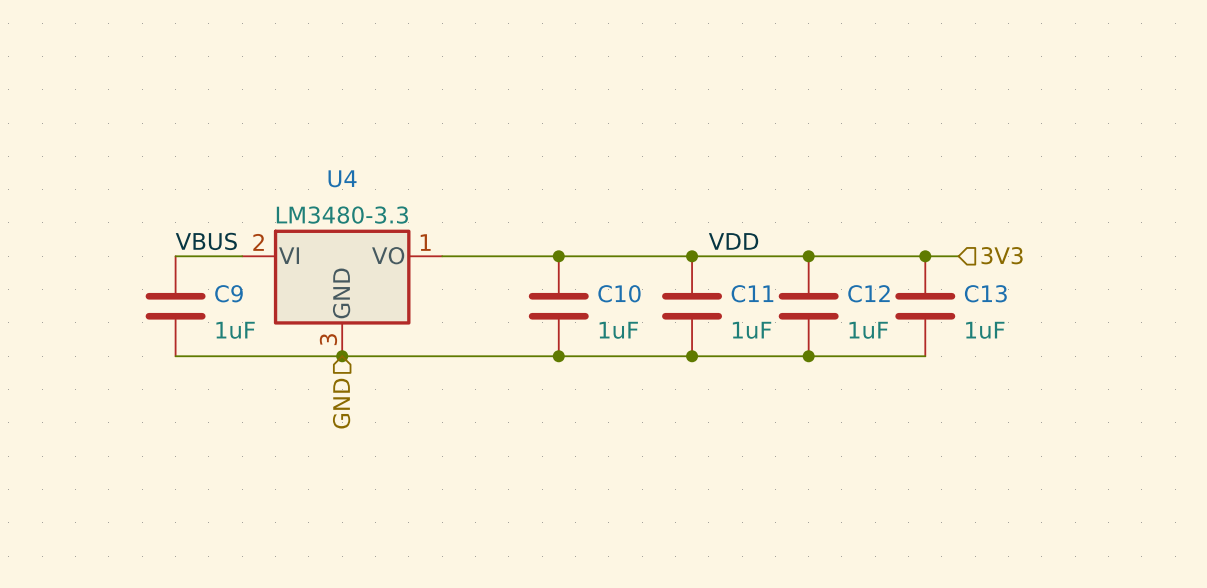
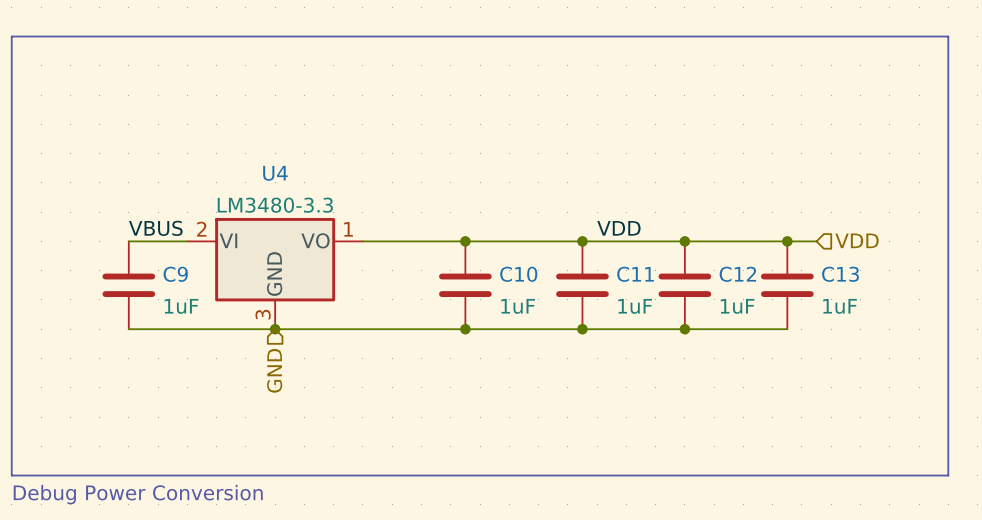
line: none -> (11, 36) (11, 475) (948, 475) (948, 36) (11, 36)
hierarchical label: 3V3 (1002, 255) -> VDD (856, 240)
text: none -> Debug Power Conversion (138, 494)

